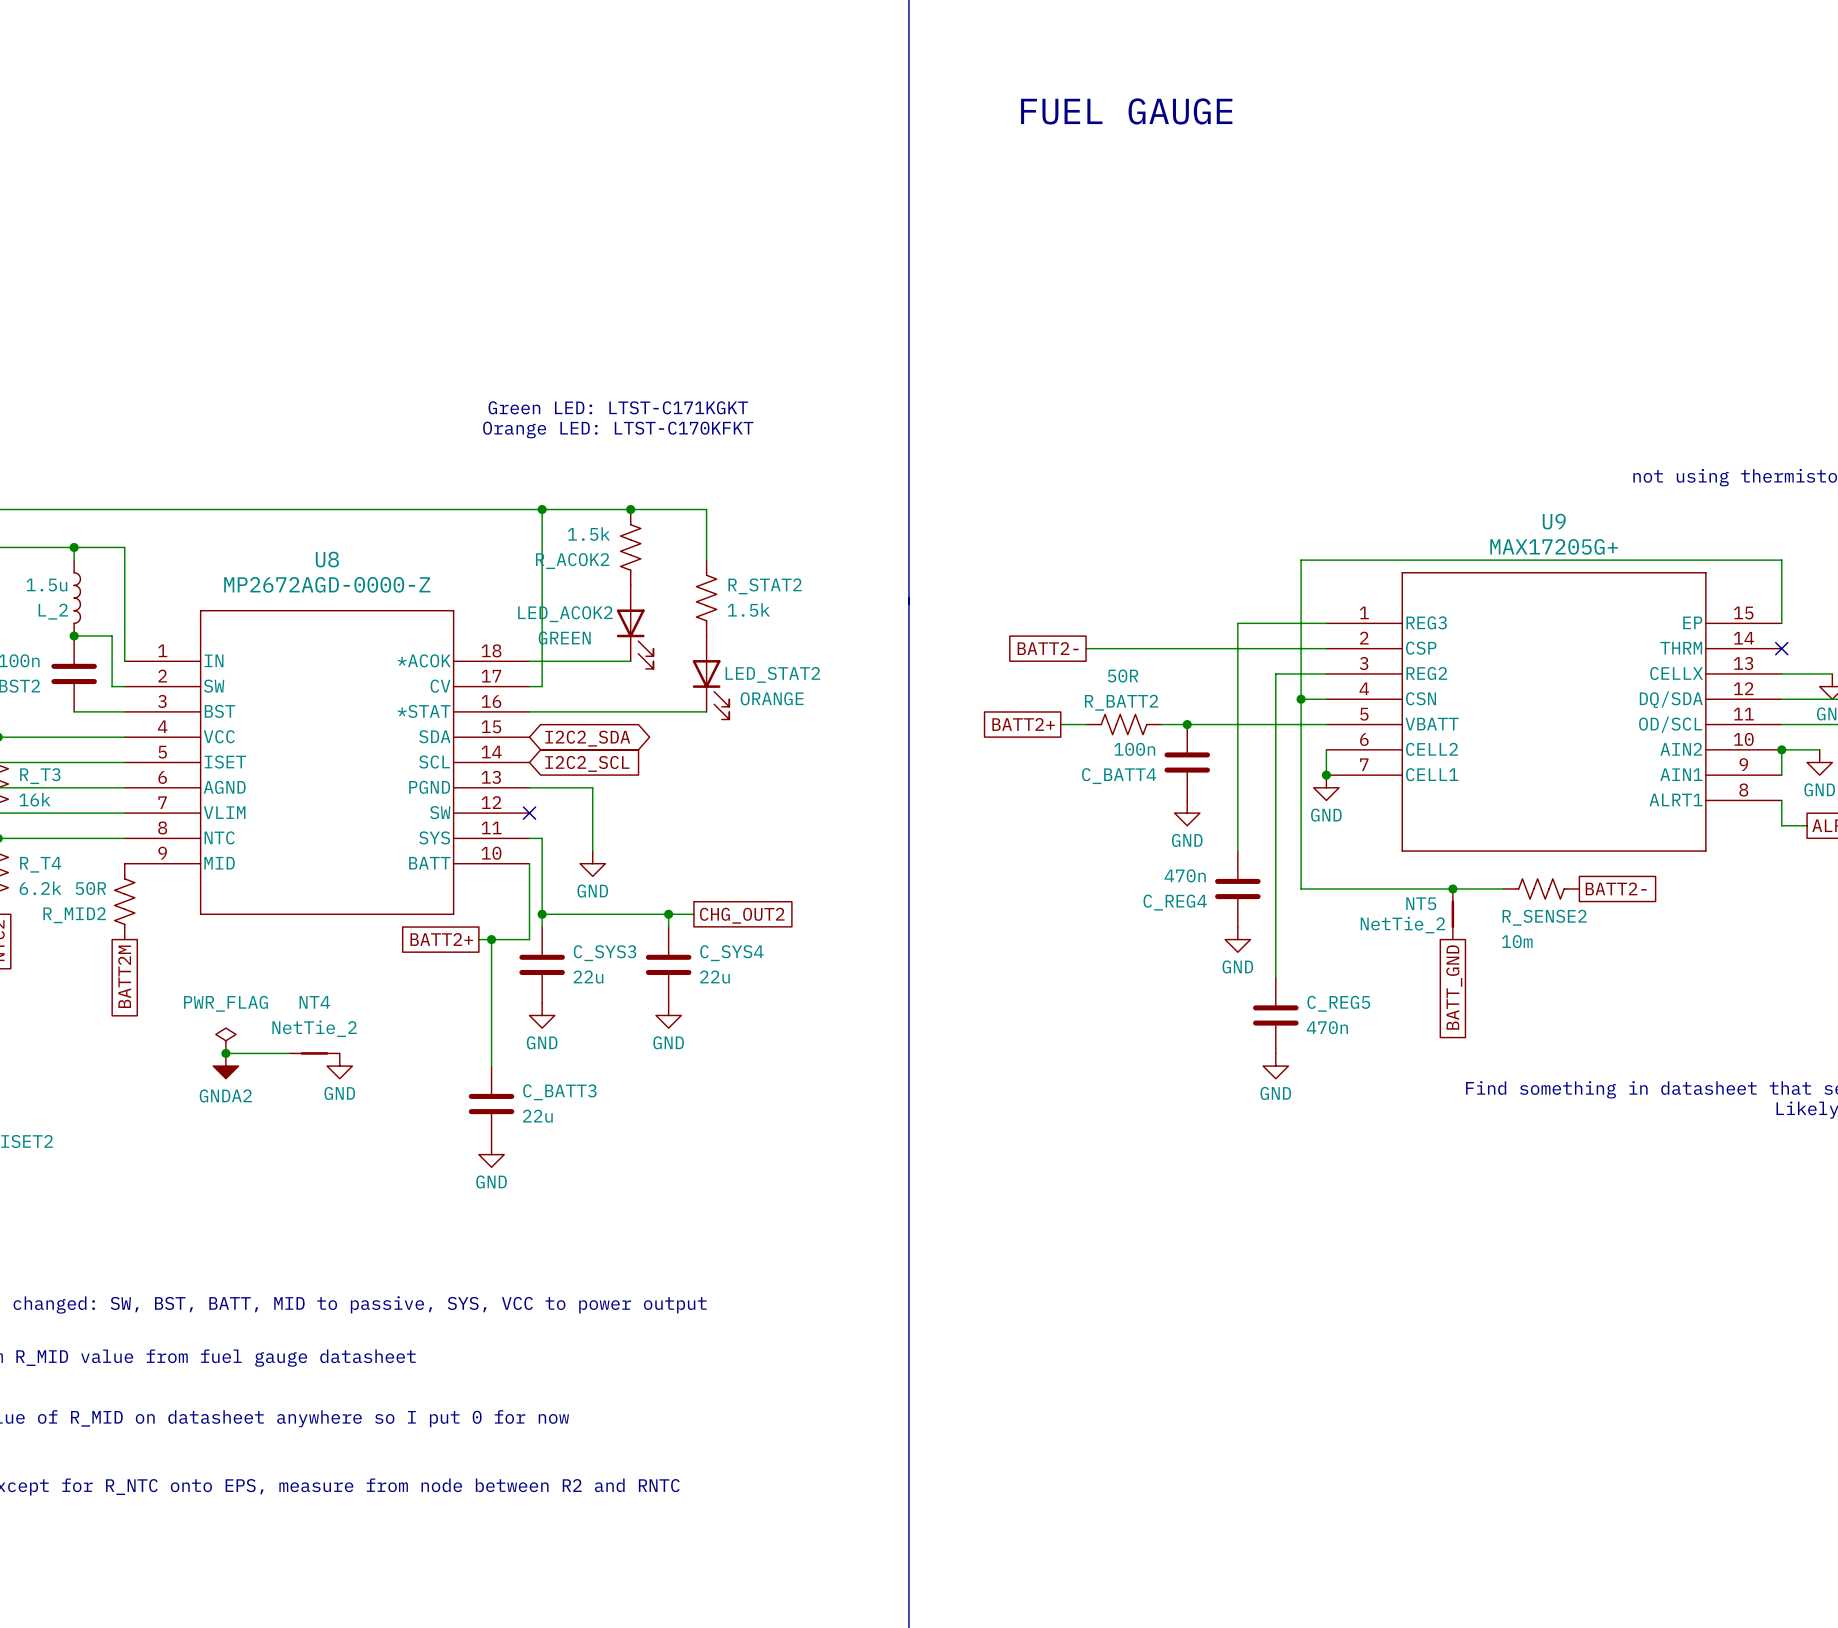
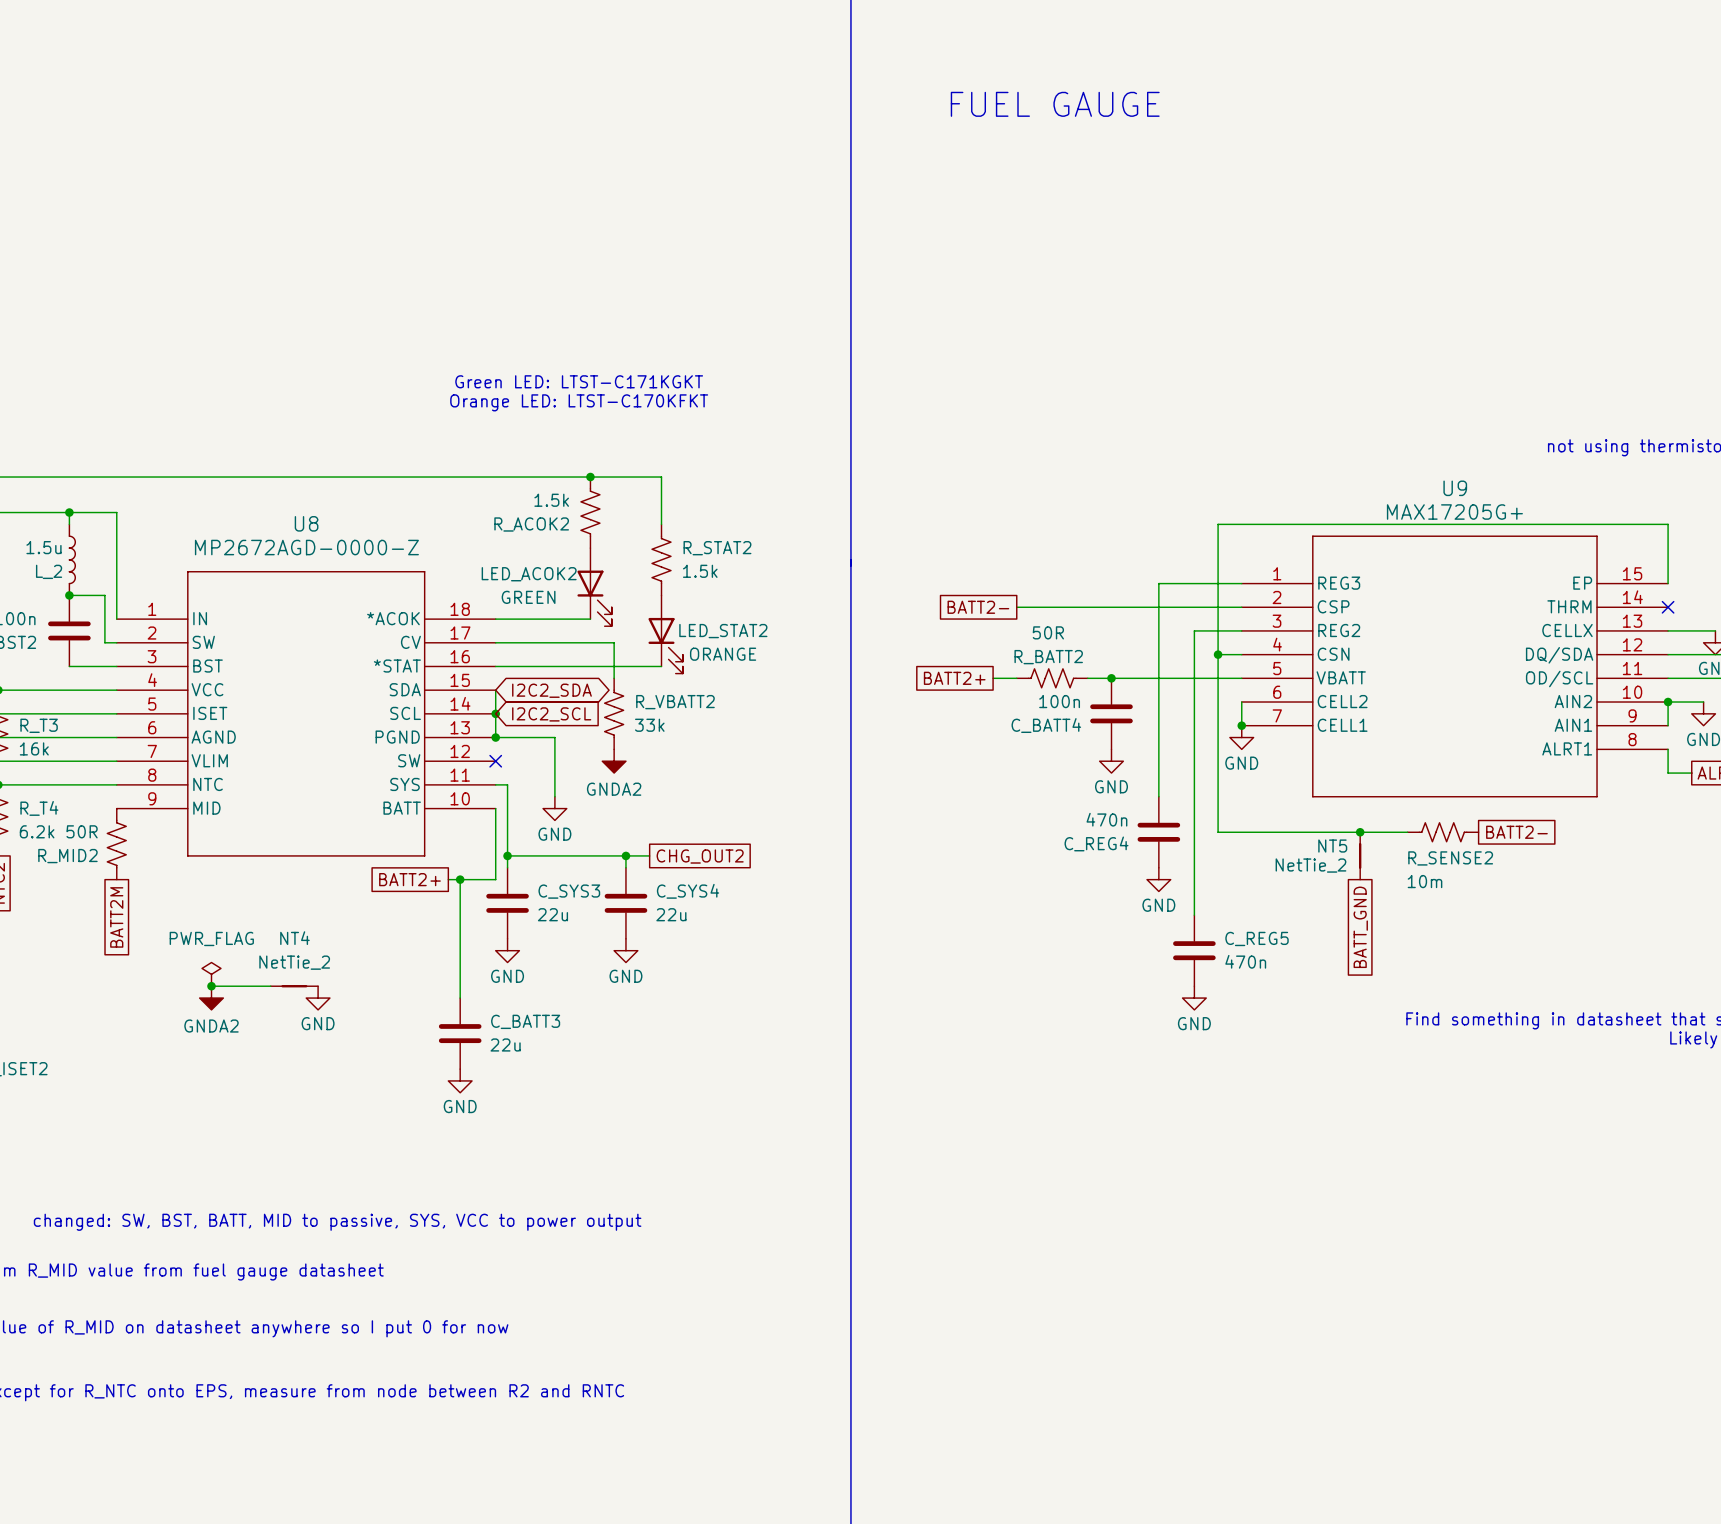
wire: (542, 509) (542, 686) -> (614, 678) (614, 642) (507, 642)
junction: (542, 509) -> none
wire: none -> (495, 690) (495, 737)
junction: none -> (495, 713)
R_VBATT2: none -> 33k (614, 713)
junction: none -> (495, 737)
power symbol: none -> GNDA2 (614, 761)

